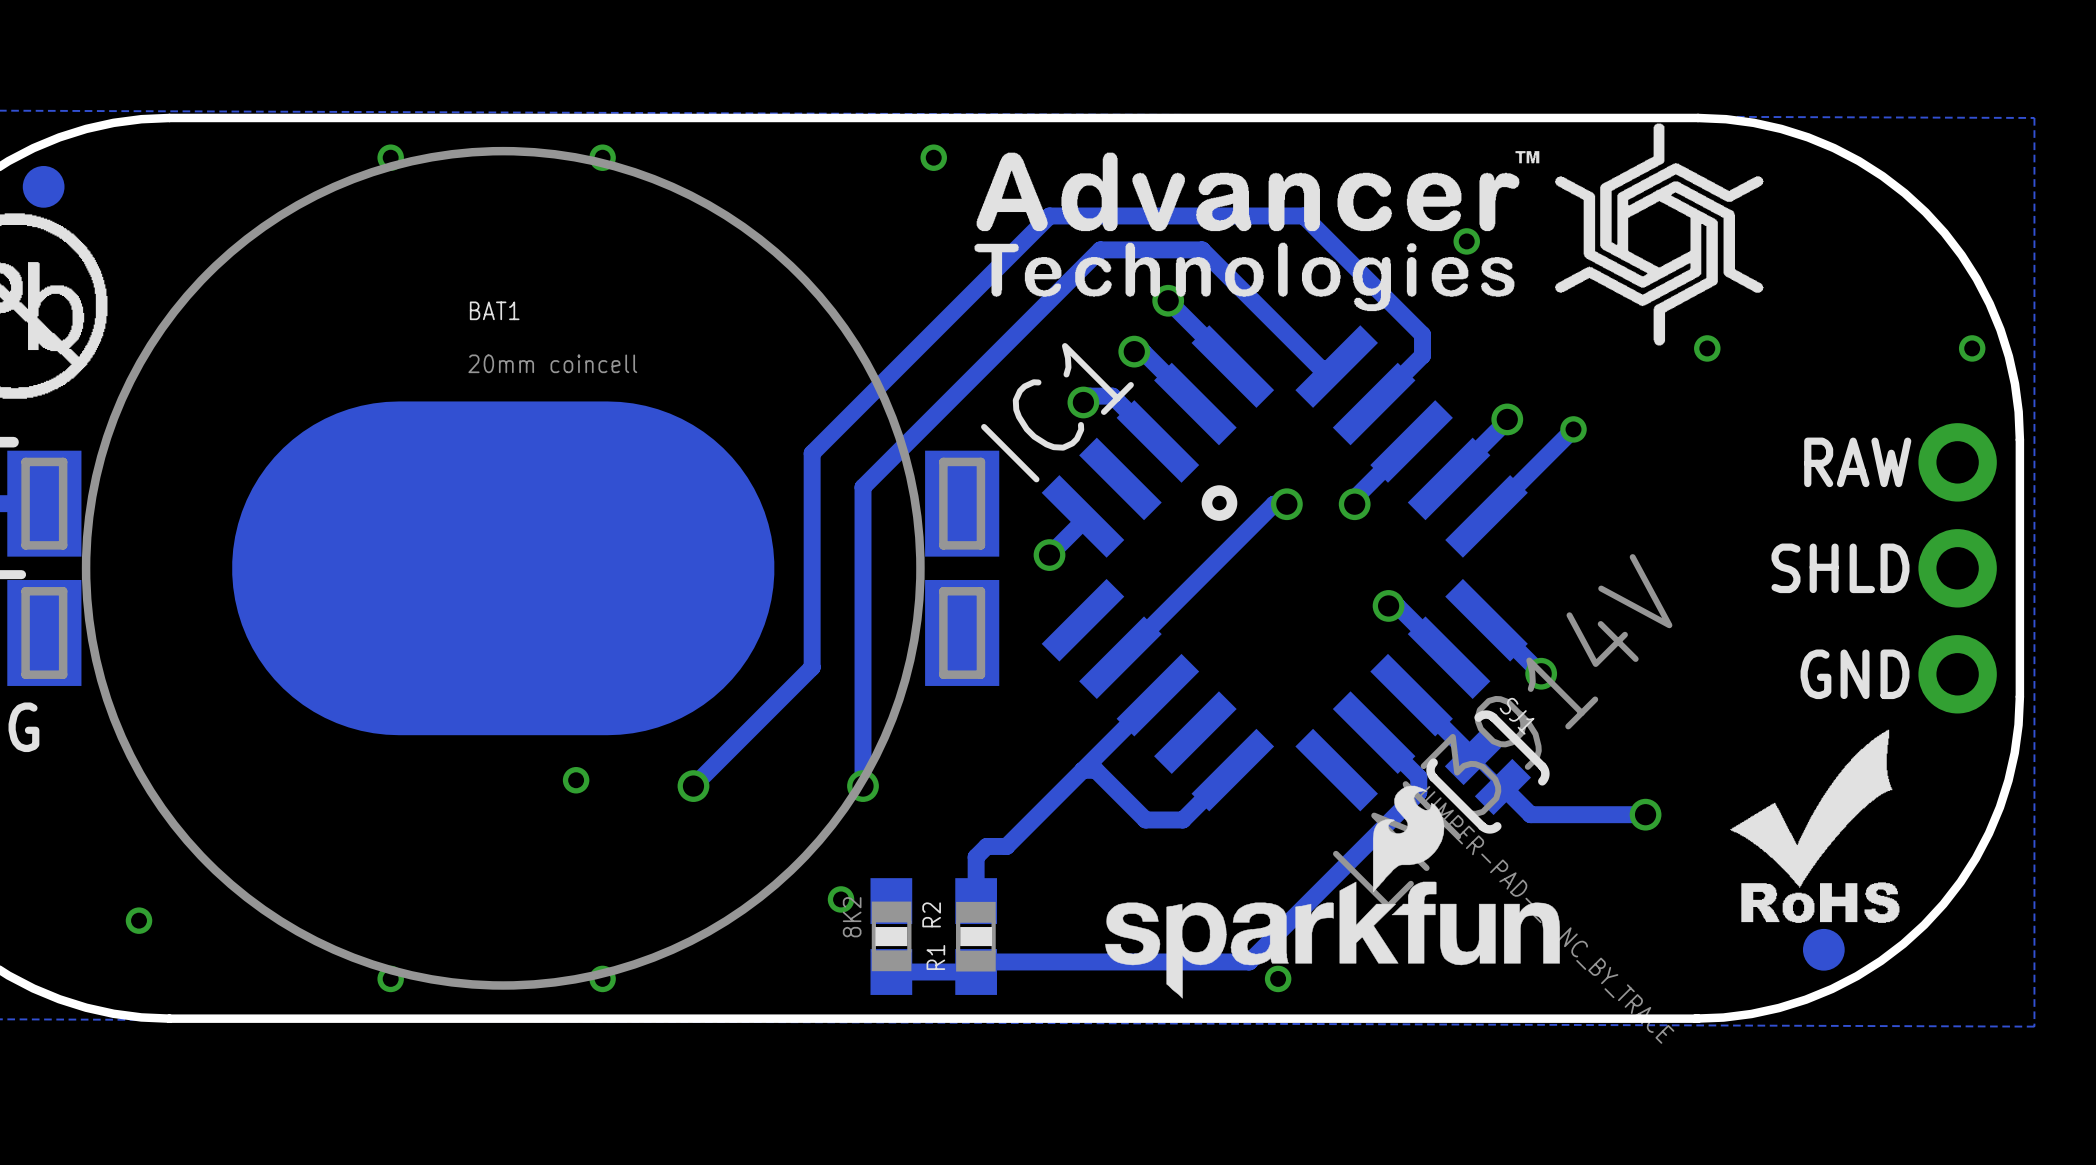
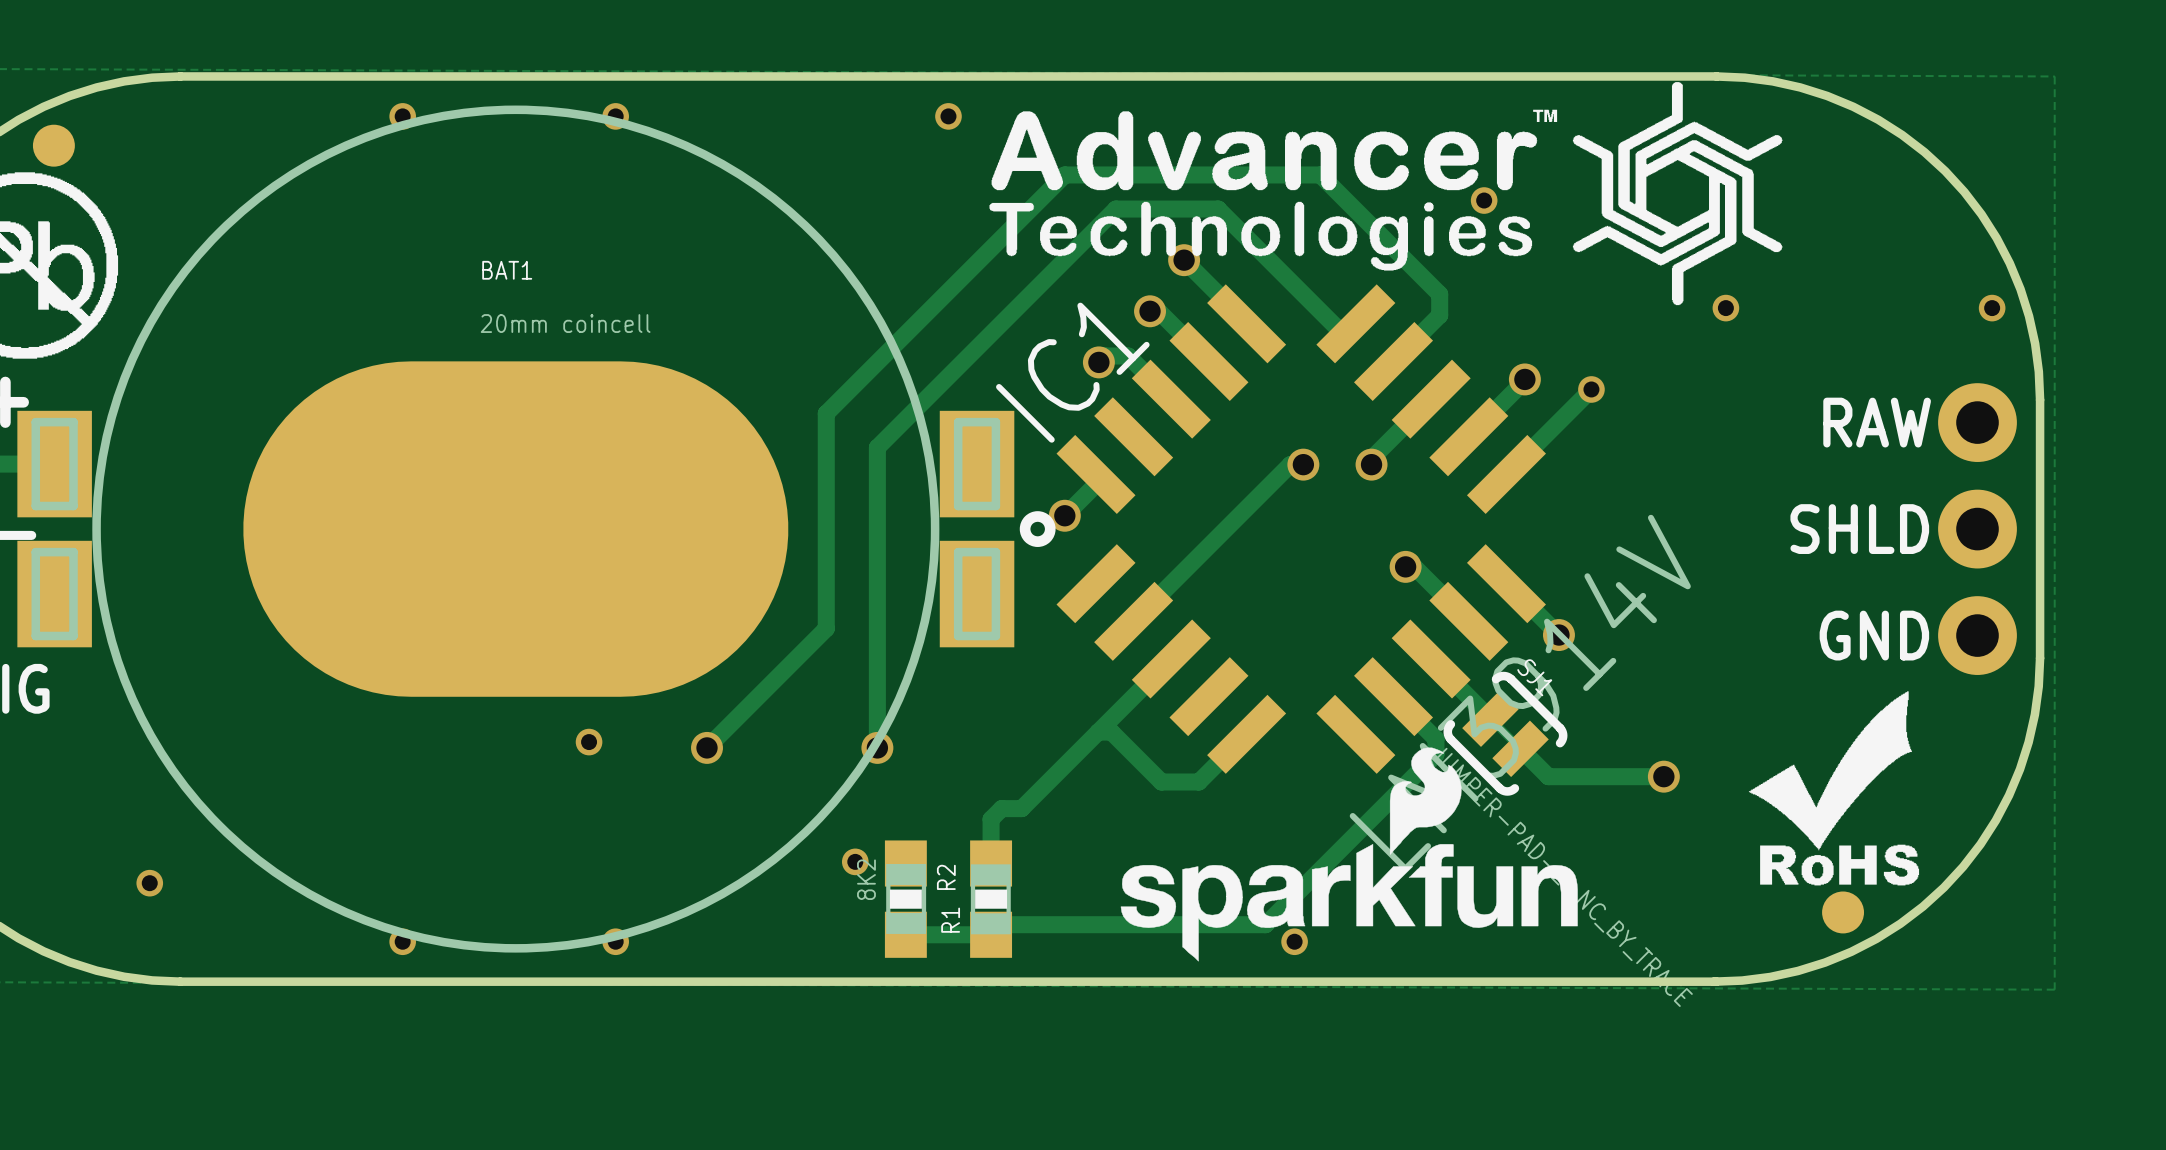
IC1 footprint: [1041, 325, 1528, 812] -> [1019, 284, 1546, 774]

